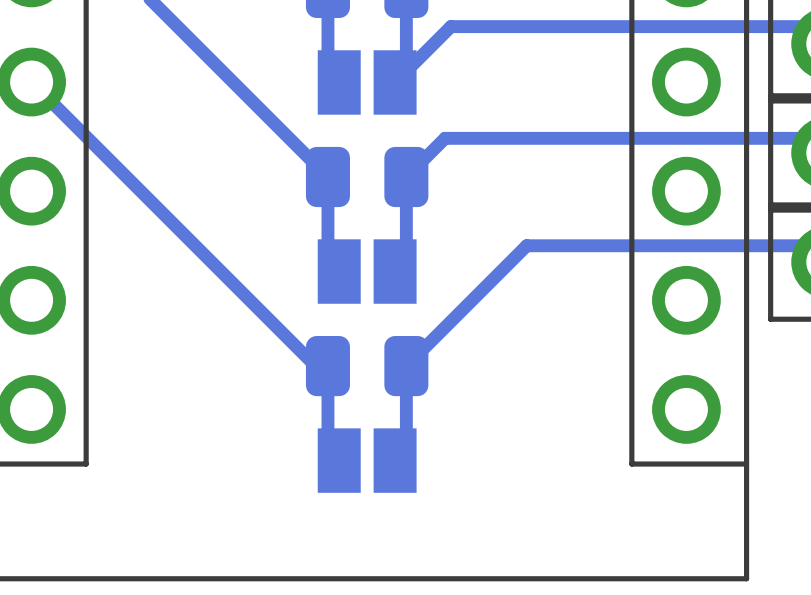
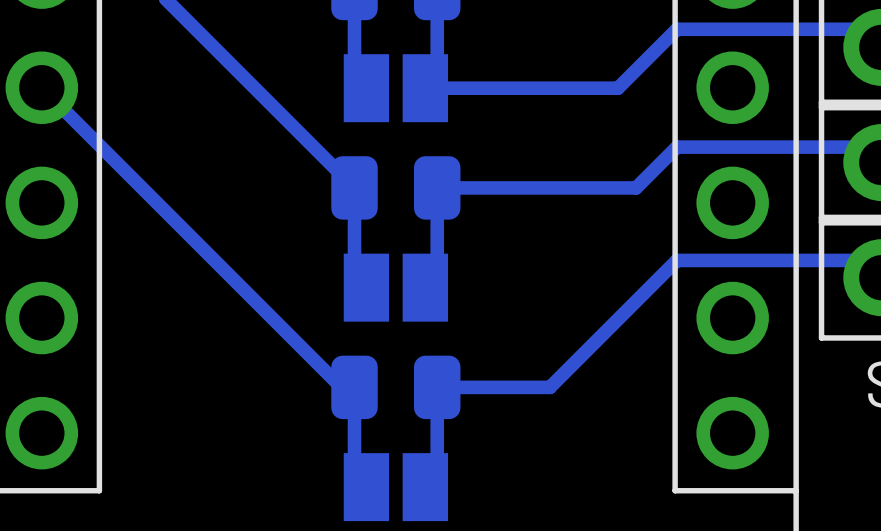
bottom track: (633, 26) (450, 26) (406, 71) -> (676, 29) (617, 88) (425, 88)
bottom track: (633, 138) (445, 138) (406, 177) -> (676, 147) (636, 187) (437, 187)
bottom track: (633, 245) (526, 245) (406, 366) -> (676, 260) (549, 387) (437, 387)

